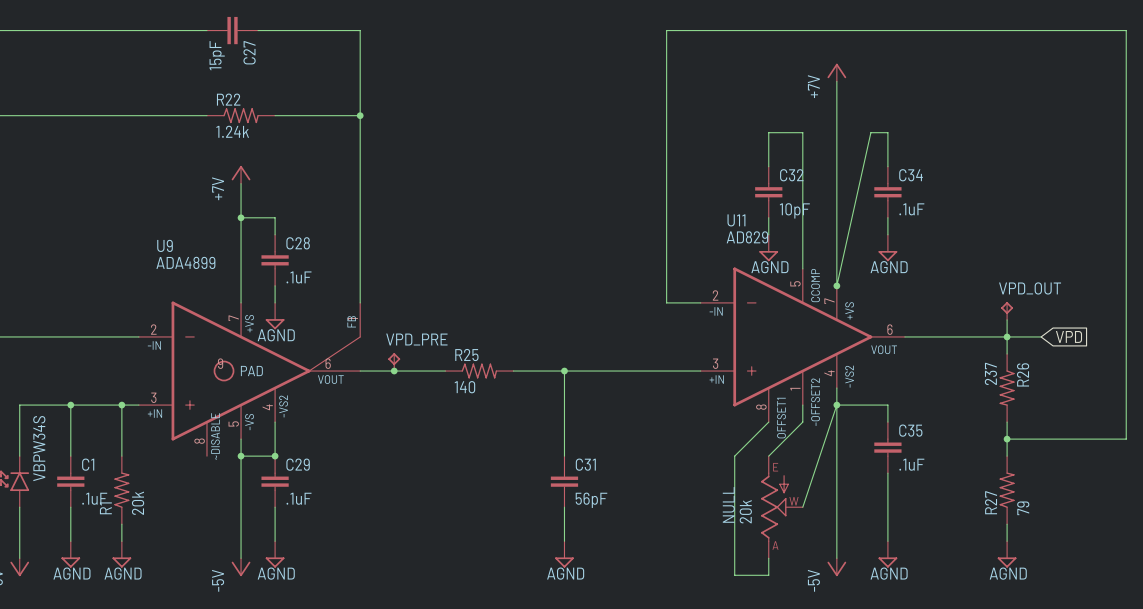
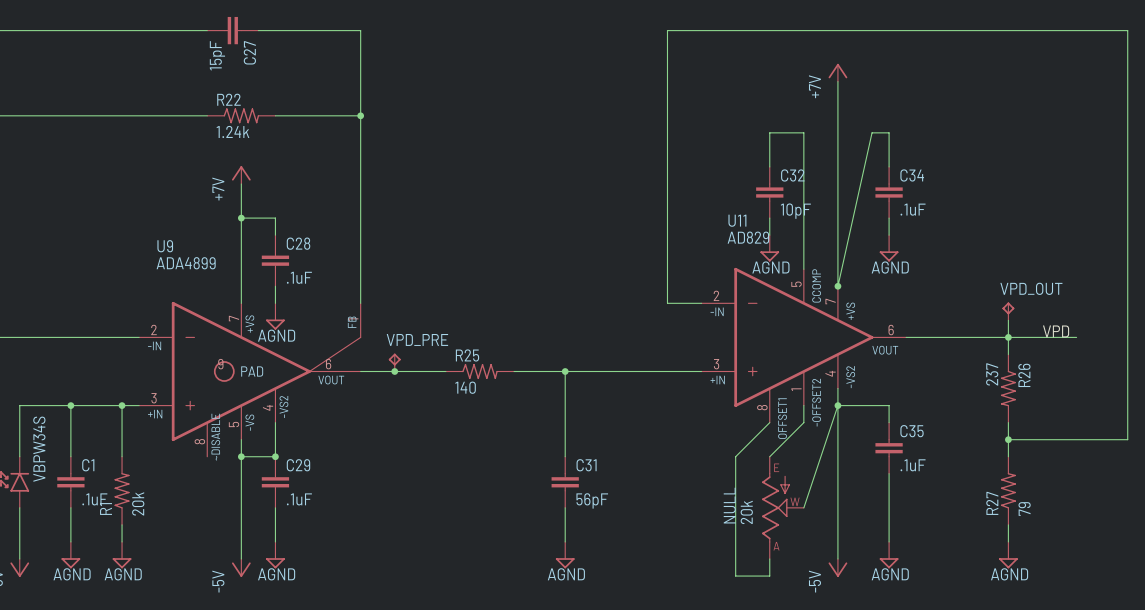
label: none -> VPD (1056, 331)
wire: none -> (1042, 337) (1076, 337)
global label: VPD (1069, 336) -> none

